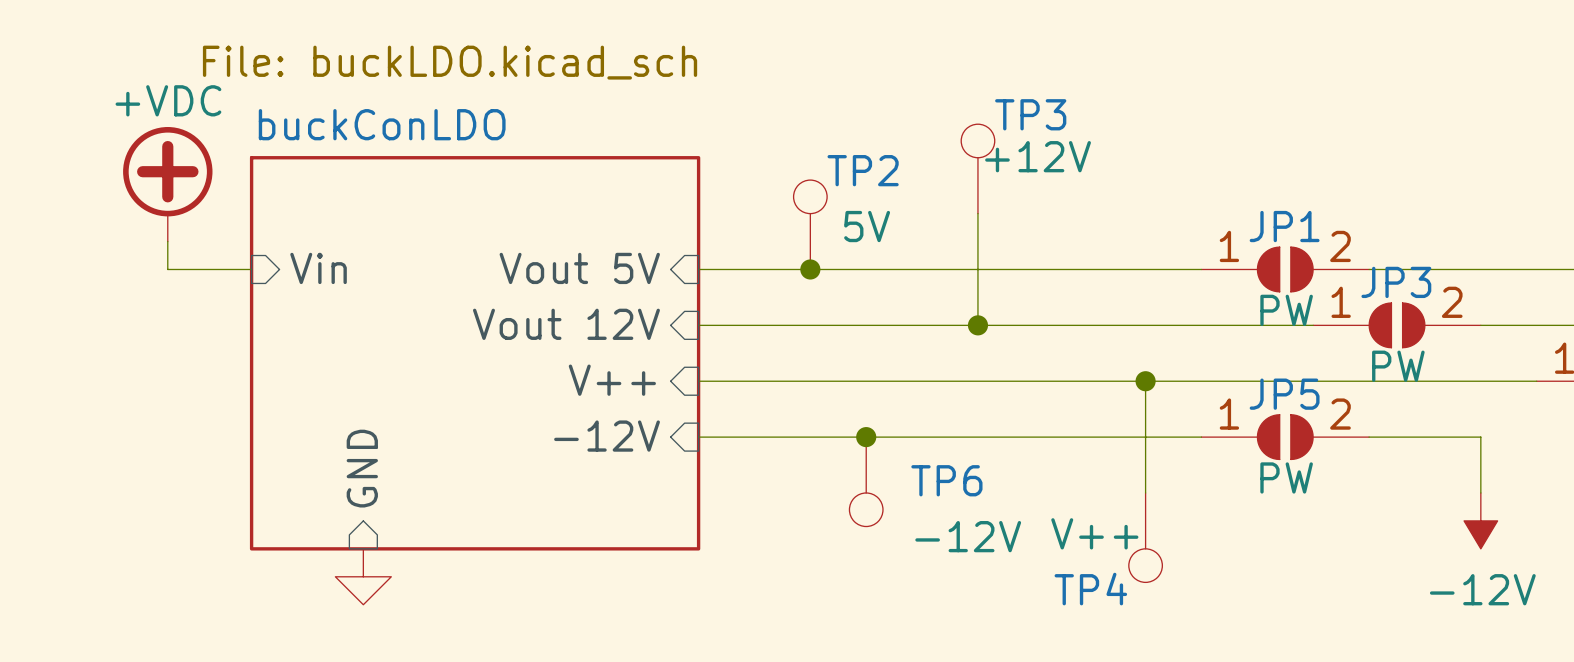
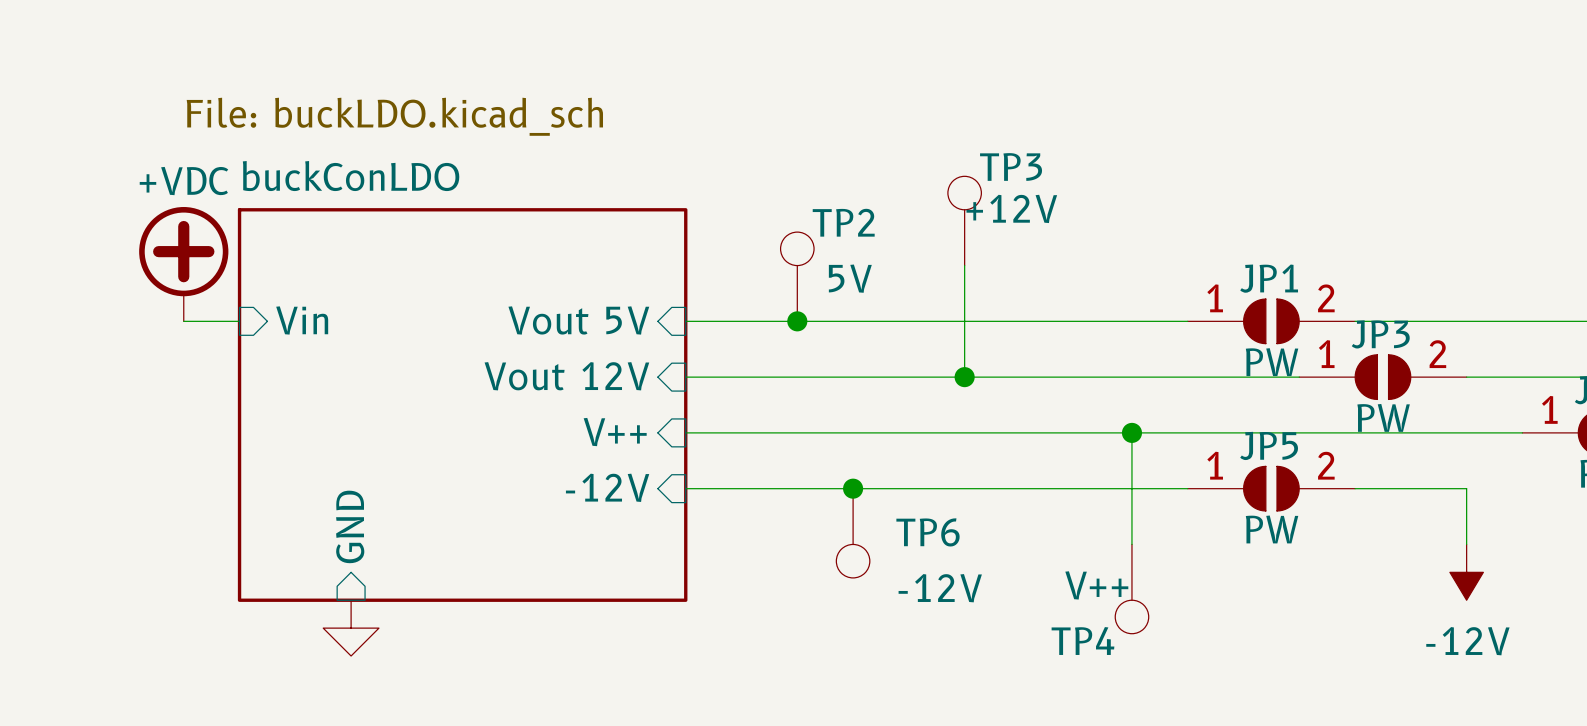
power symbol position: +VDC (167, 184) -> +VDC (183, 264)
wire: (167, 241) (167, 269) (195, 269) -> none

